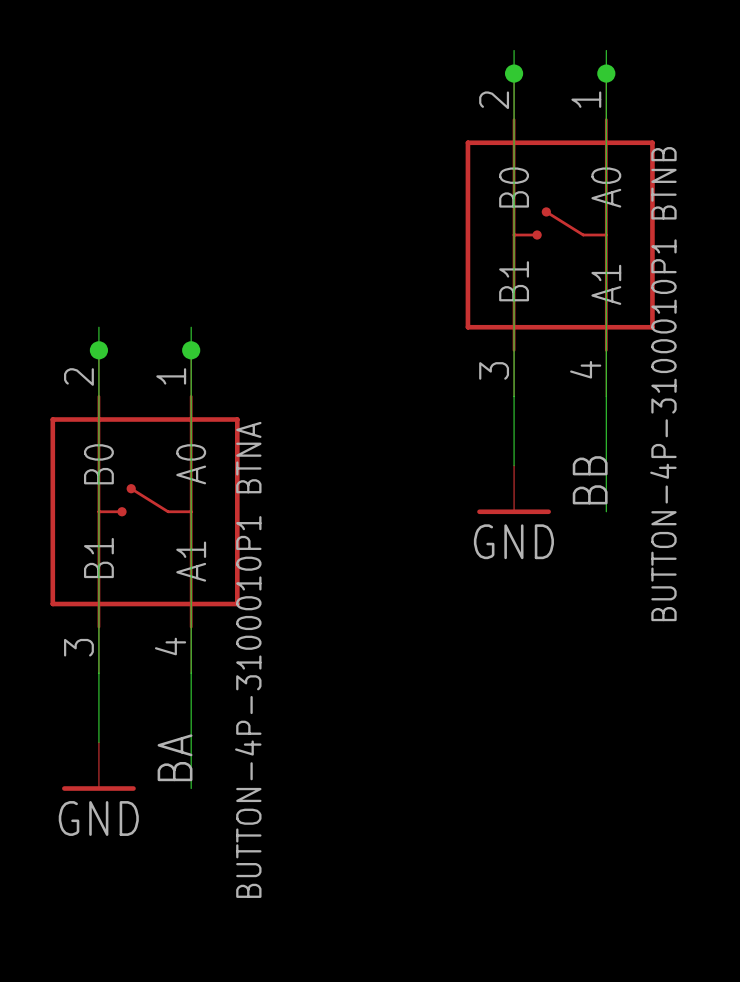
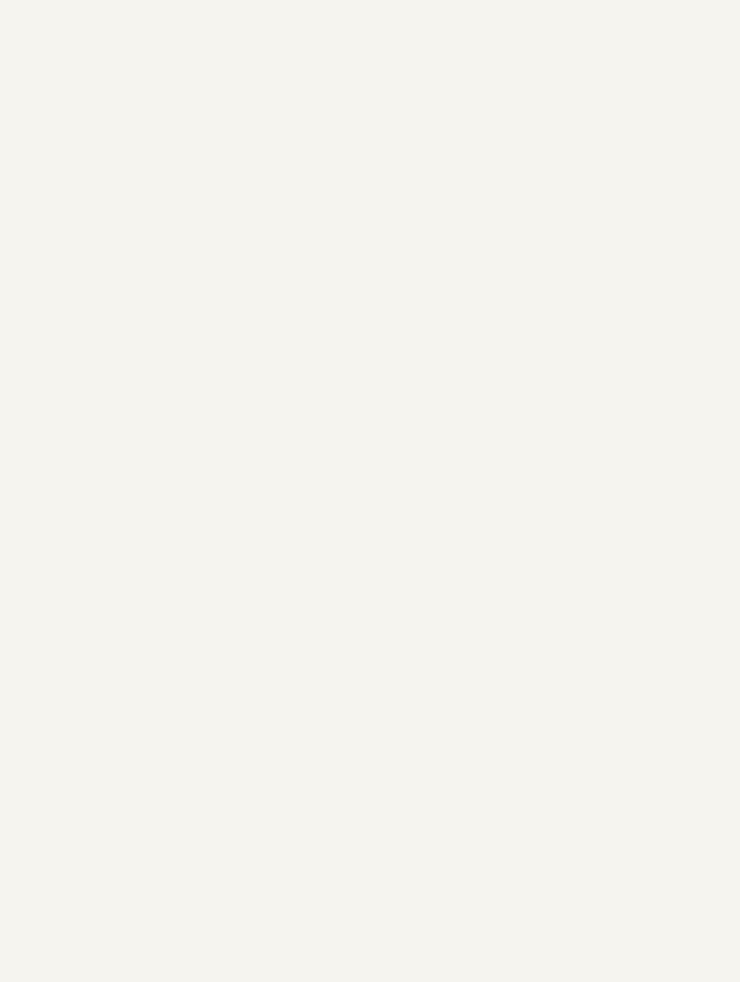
wire: (514, 50) (514, 465) -> none
wire: (606, 50) (606, 511) -> none
junction: (514, 73) -> none
junction: (606, 73) -> none
BTNB: BUTTON-4P-3100010P1 (560, 235) -> none
wire: (98, 327) (98, 742) -> none
wire: (191, 327) (191, 788) -> none
junction: (98, 350) -> none
junction: (191, 350) -> none
label: BB (590, 480) -> none
power symbol: GND (514, 489) -> none
BTNA: BUTTON-4P-3100010P1 (145, 511) -> none
label: BA (175, 757) -> none
power symbol: GND (98, 766) -> none

